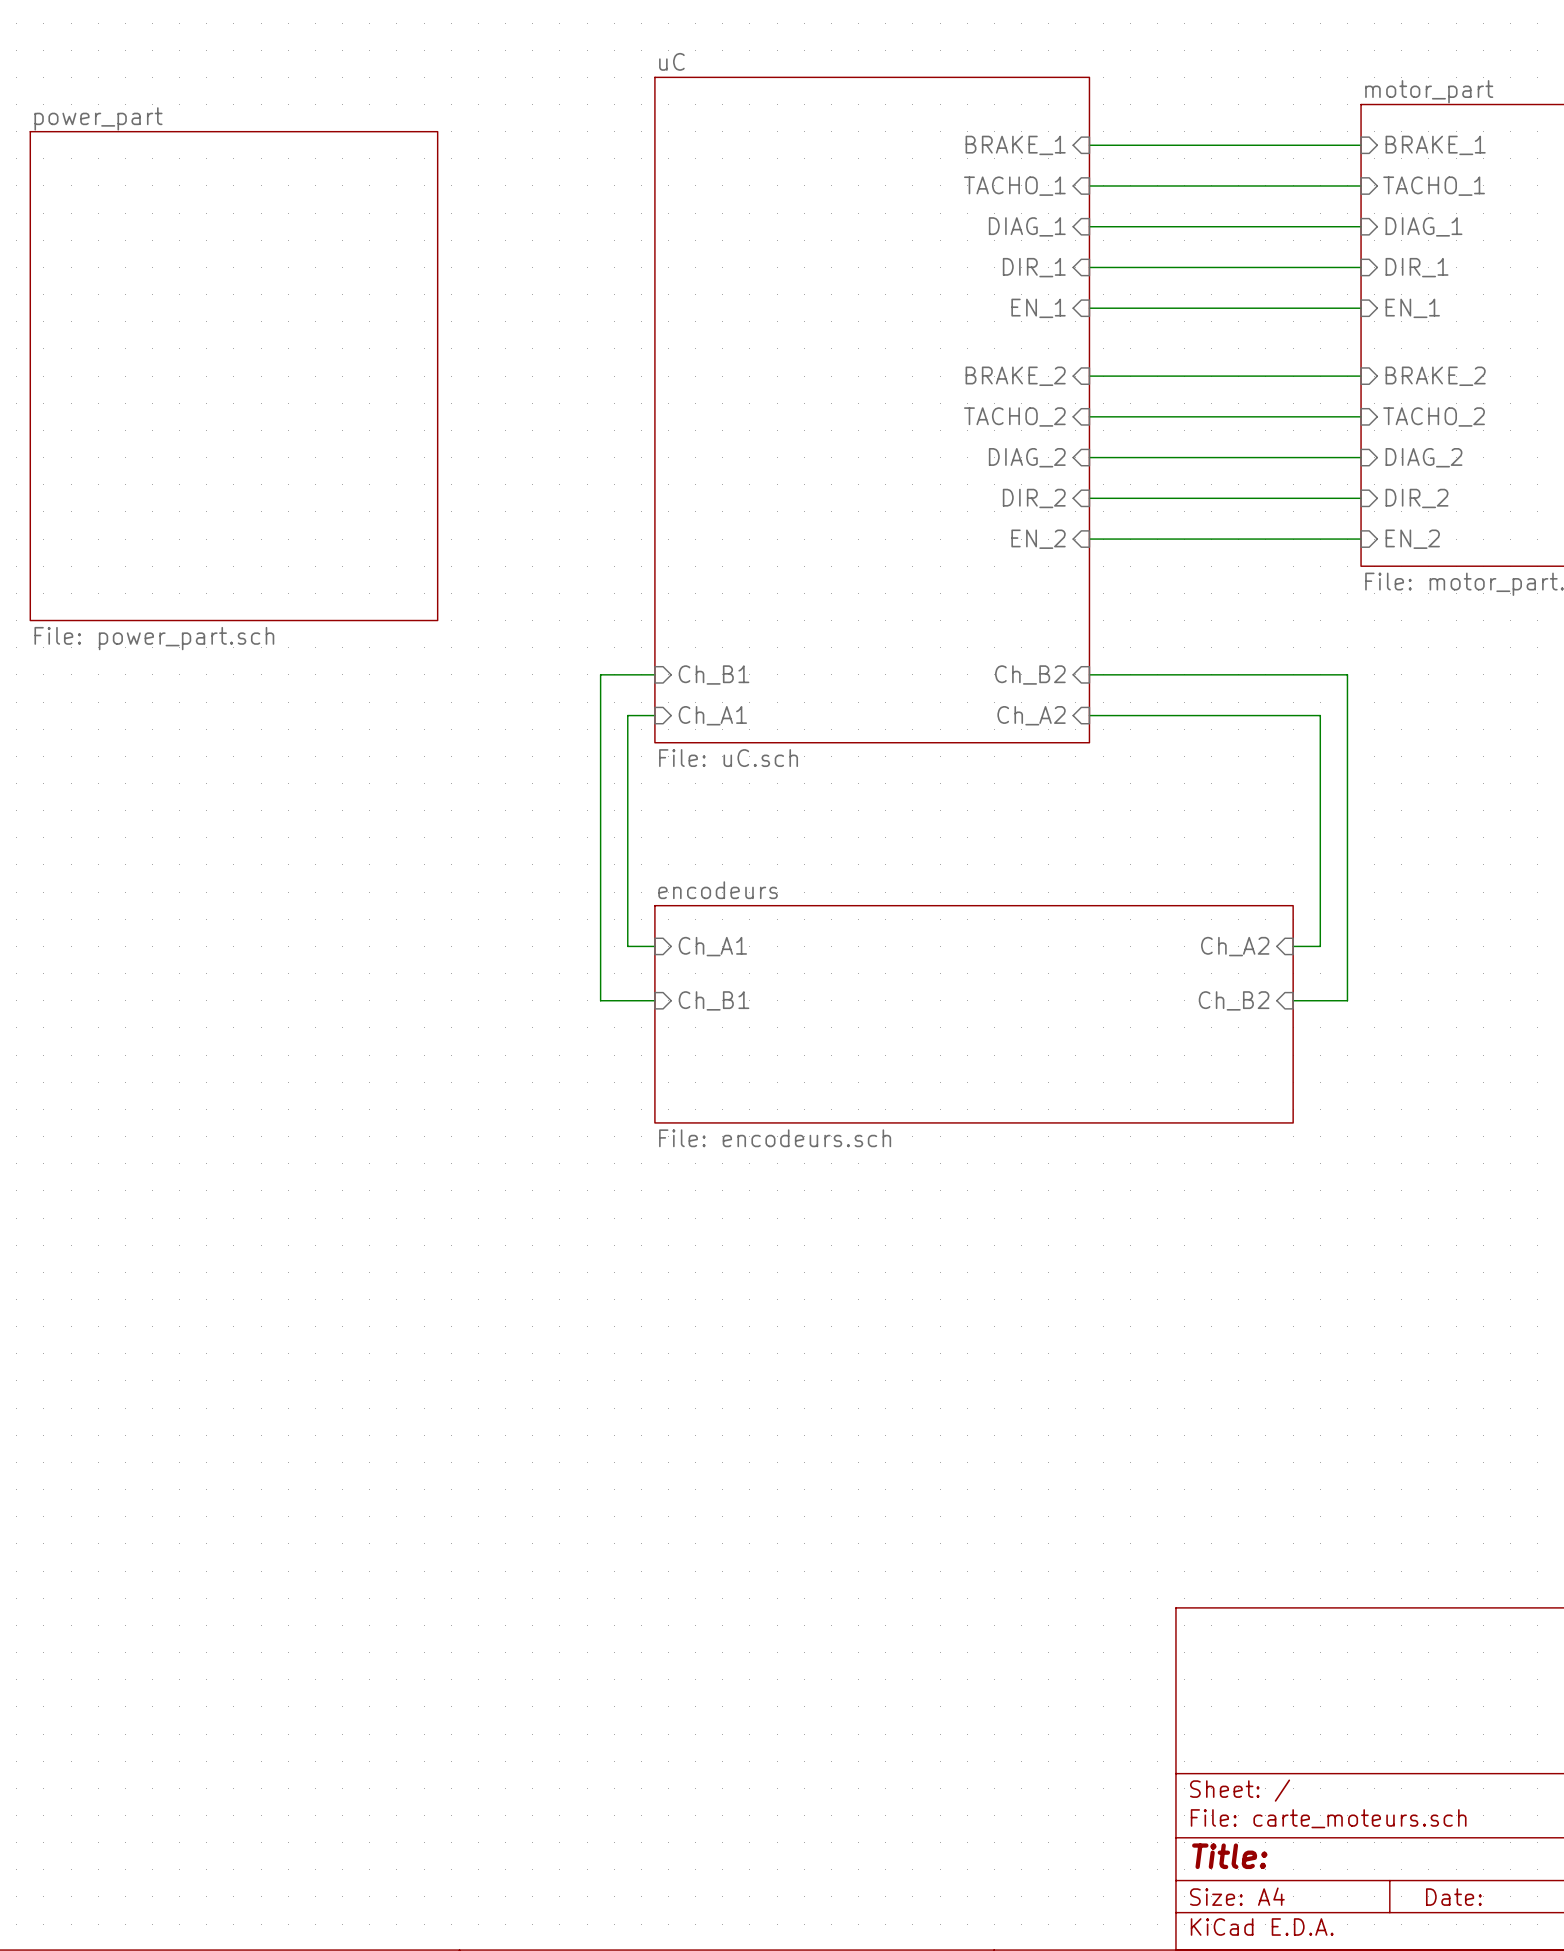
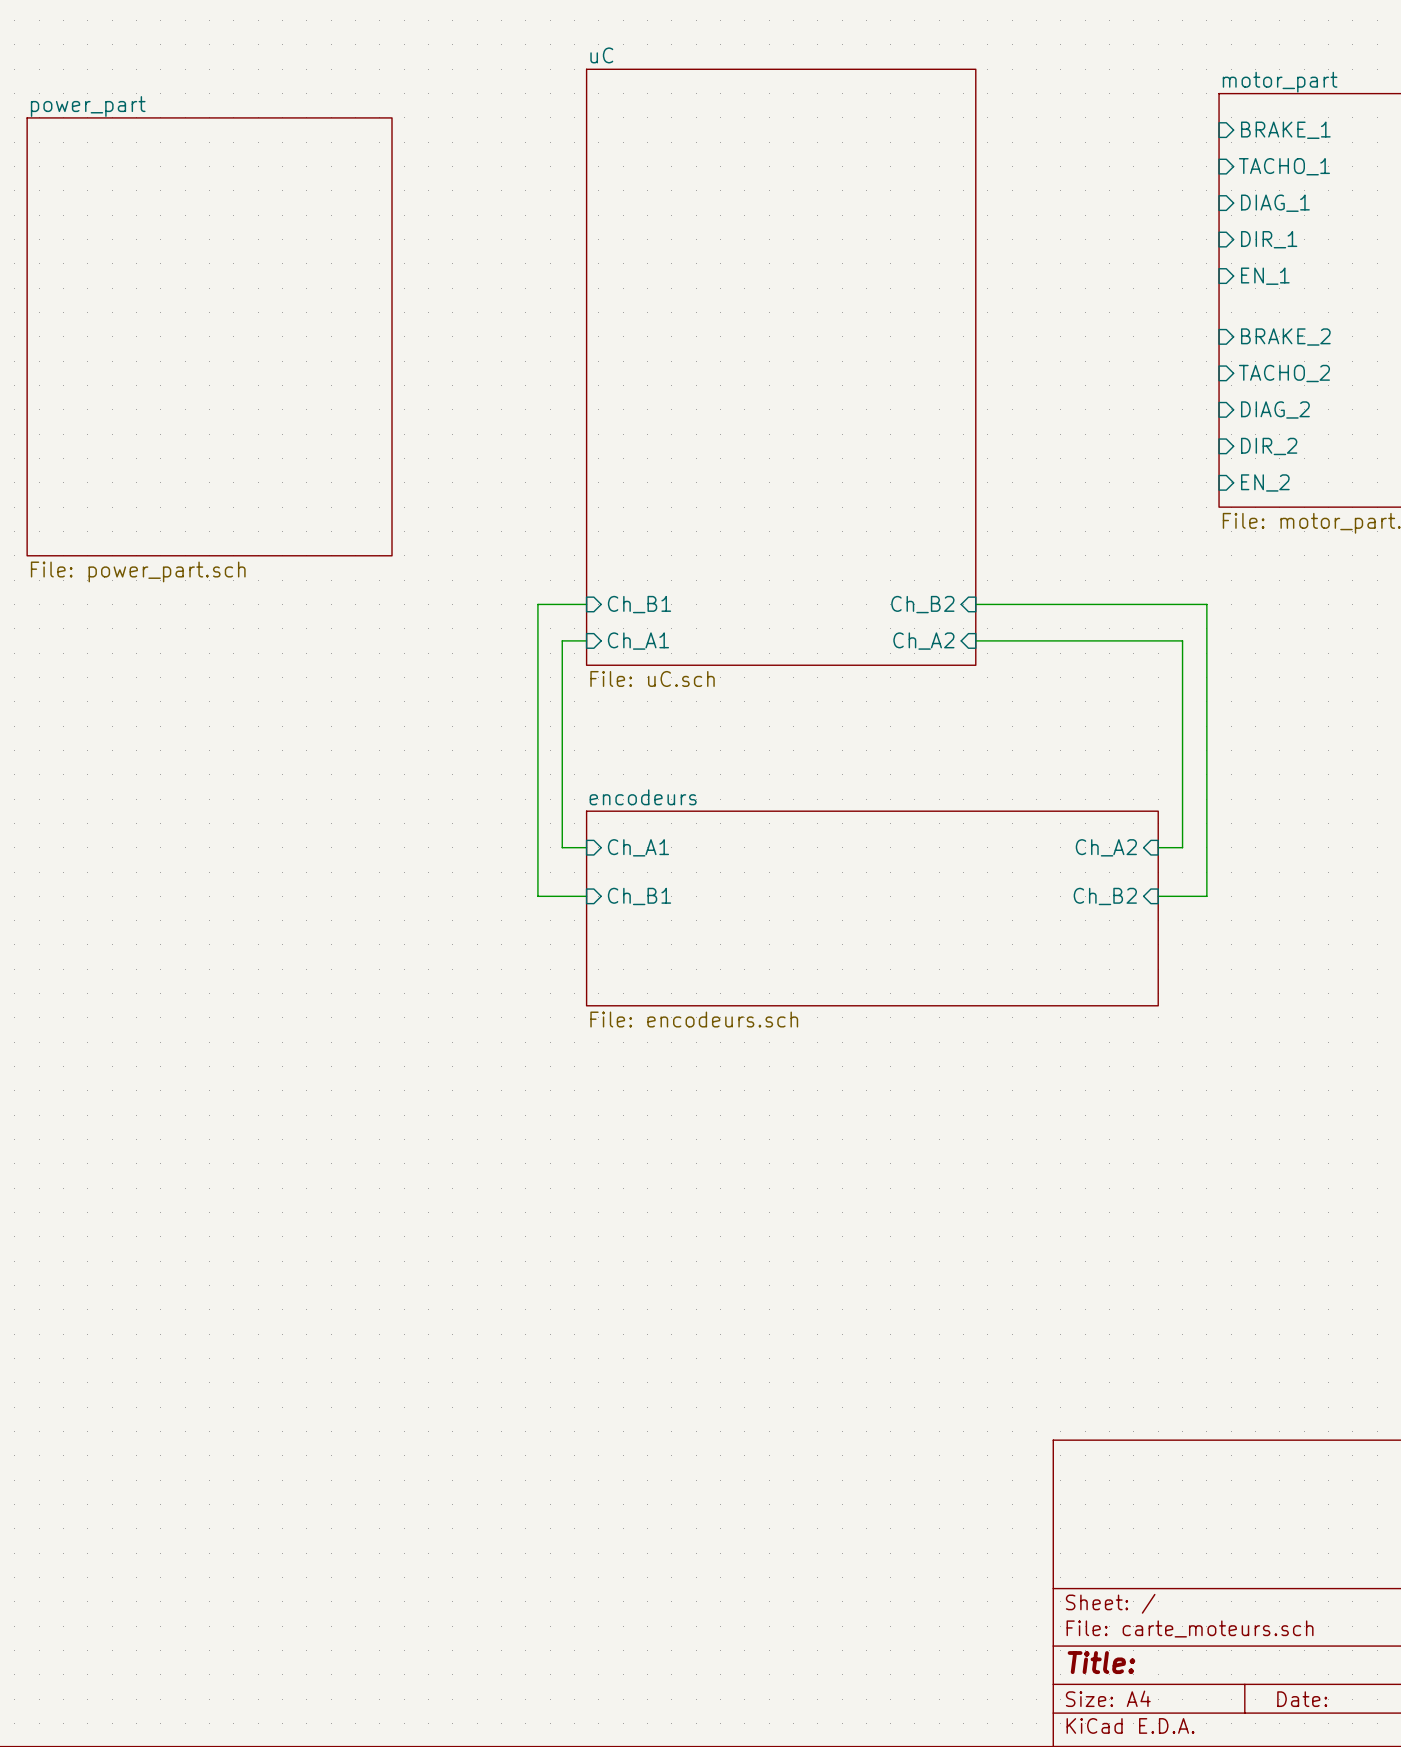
sheet pin: BRAKE_1 (1015, 145) -> none
wire: (1089, 145) (1361, 145) -> none
wire: (1089, 185) (1361, 185) -> none
sheet pin: TACHO_1 (1014, 186) -> none
sheet pin: DIAG_1 (1027, 226) -> none
wire: (1089, 226) (1361, 226) -> none
sheet pin: DIR_1 (1034, 267) -> none
wire: (1089, 267) (1361, 267) -> none
sheet pin: EN_1 (1038, 308) -> none
wire: (1089, 308) (1361, 308) -> none
sheet pin: BRAKE_2 (1015, 376) -> none
wire: (1089, 376) (1361, 376) -> none
wire: (1089, 416) (1361, 416) -> none
sheet pin: TACHO_2 (1014, 417) -> none
sheet pin: DIAG_2 (1027, 457) -> none
wire: (1089, 457) (1361, 457) -> none
sheet pin: DIR_2 (1034, 498) -> none
wire: (1089, 498) (1361, 498) -> none
sheet pin: EN_2 (1038, 539) -> none
wire: (1089, 539) (1361, 539) -> none

